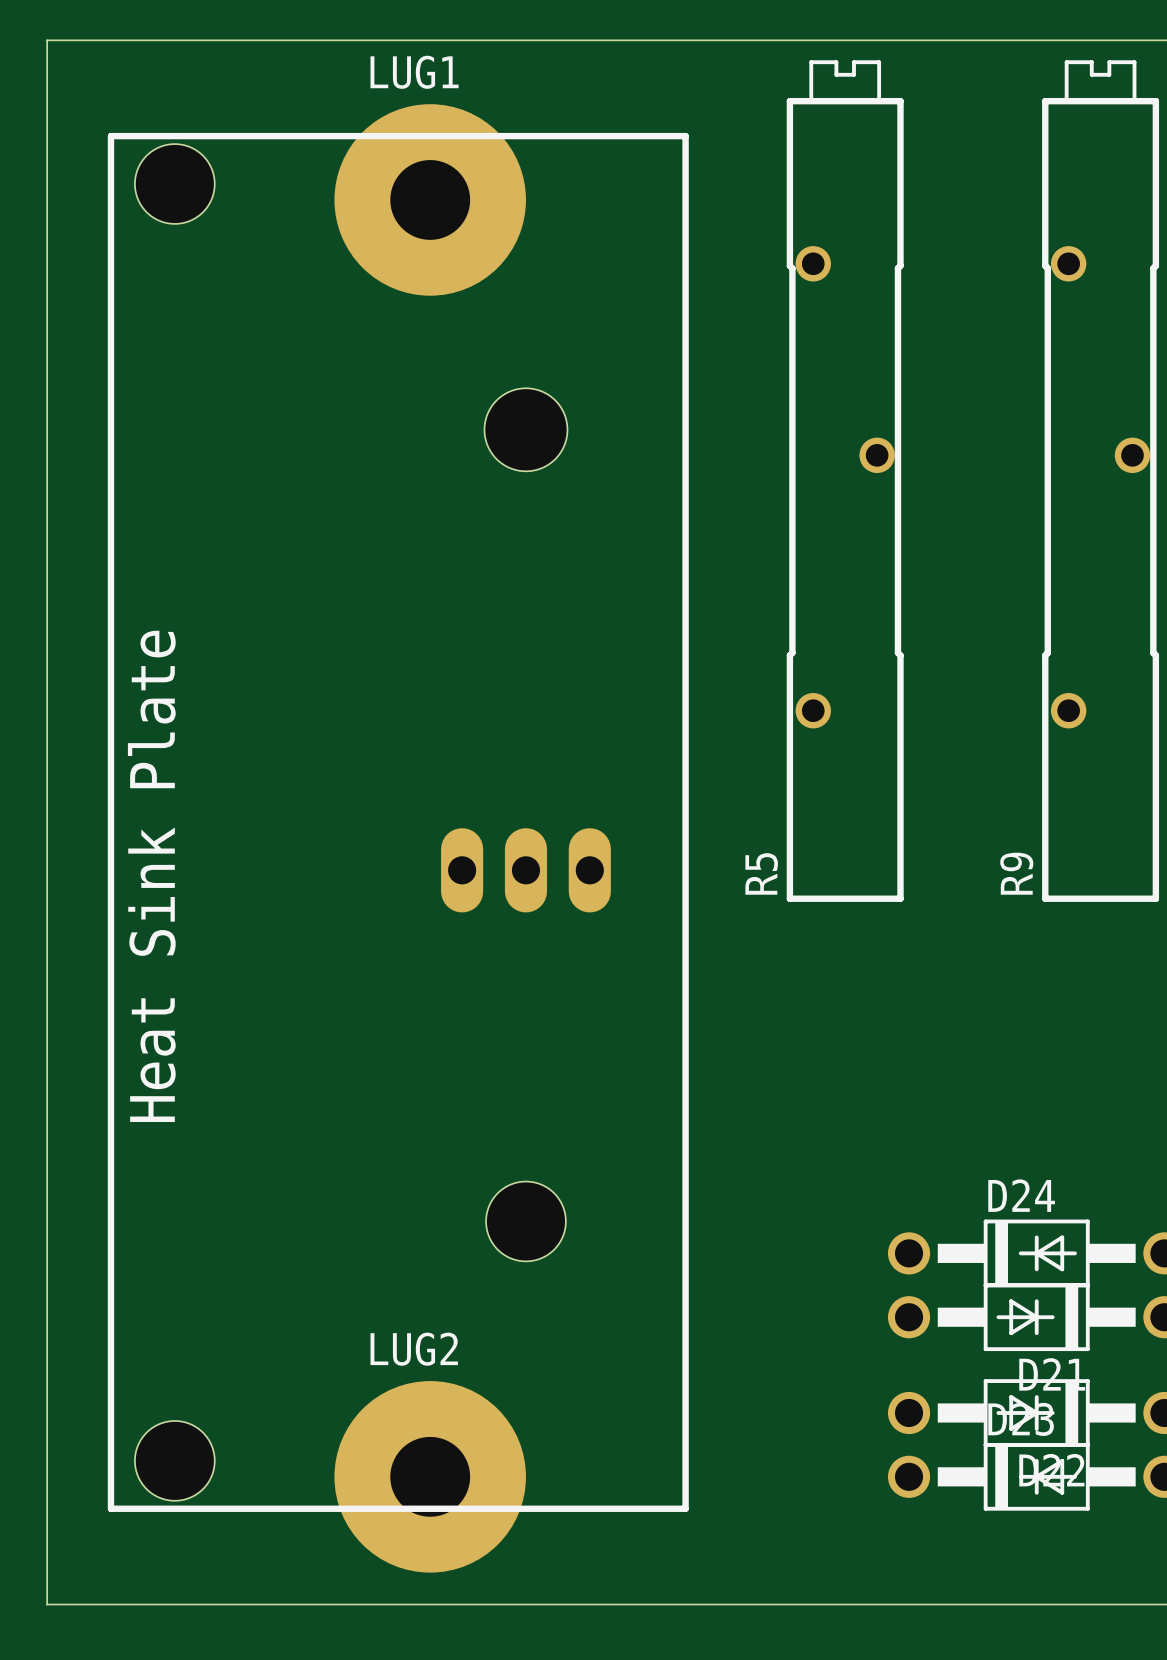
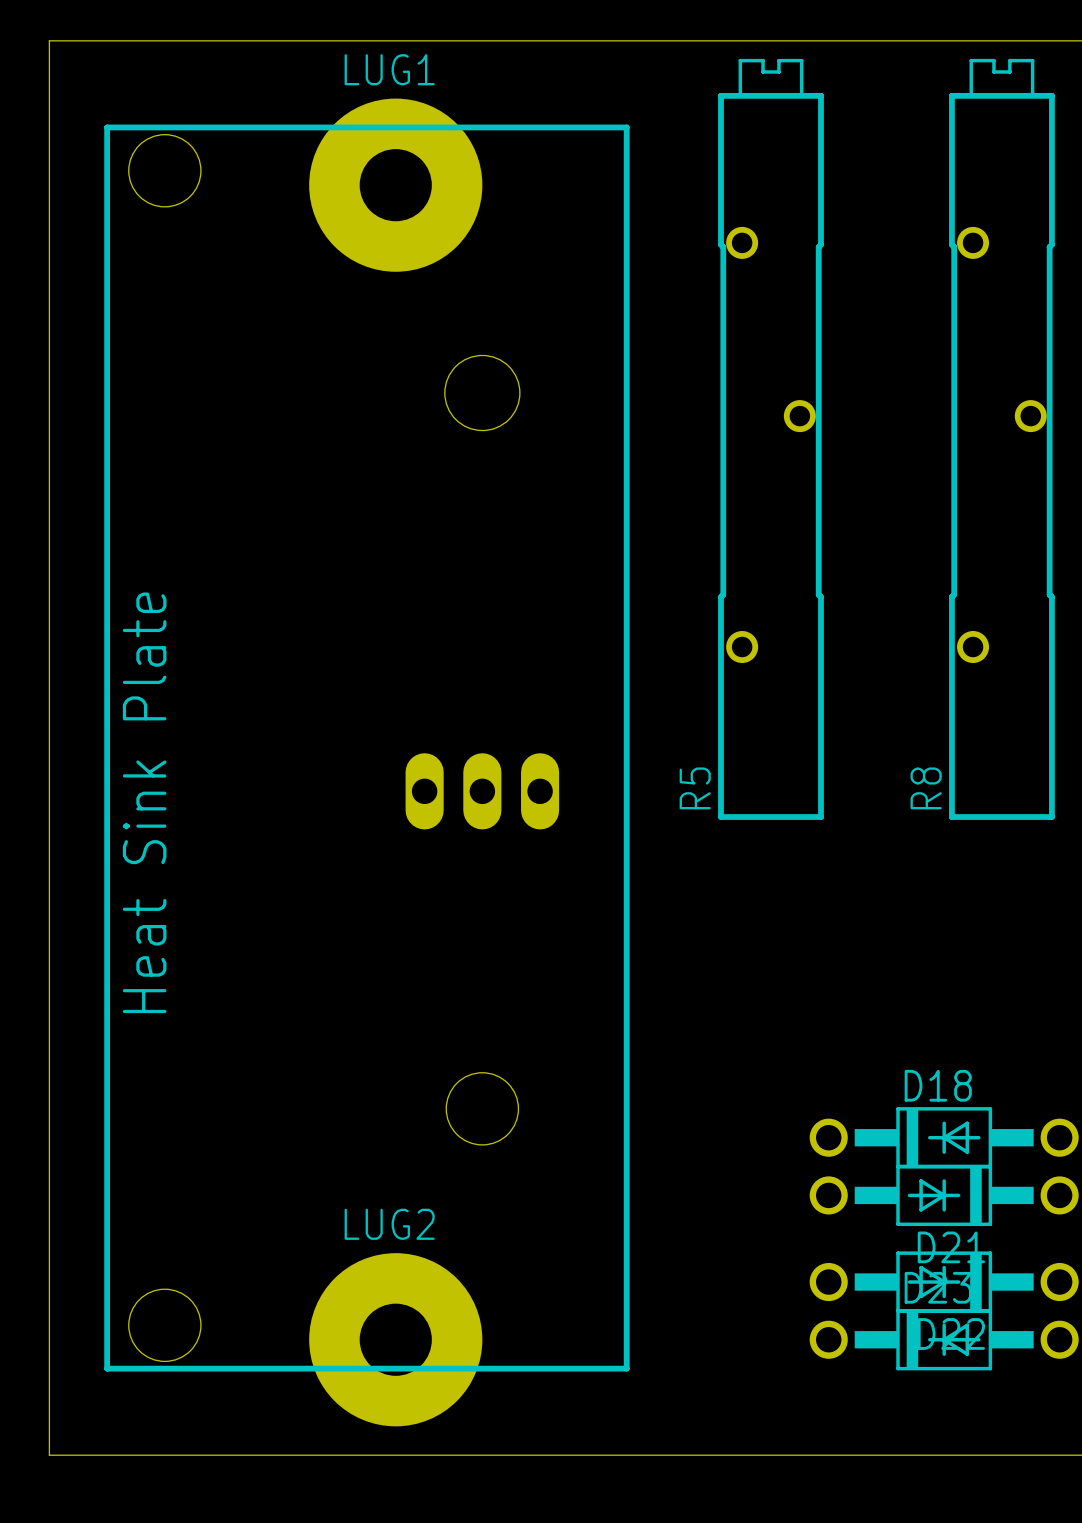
R9 name: R9 (1016, 873) -> R8 (926, 788)
D24 name: D24 (1021, 1195) -> D18 (938, 1085)

